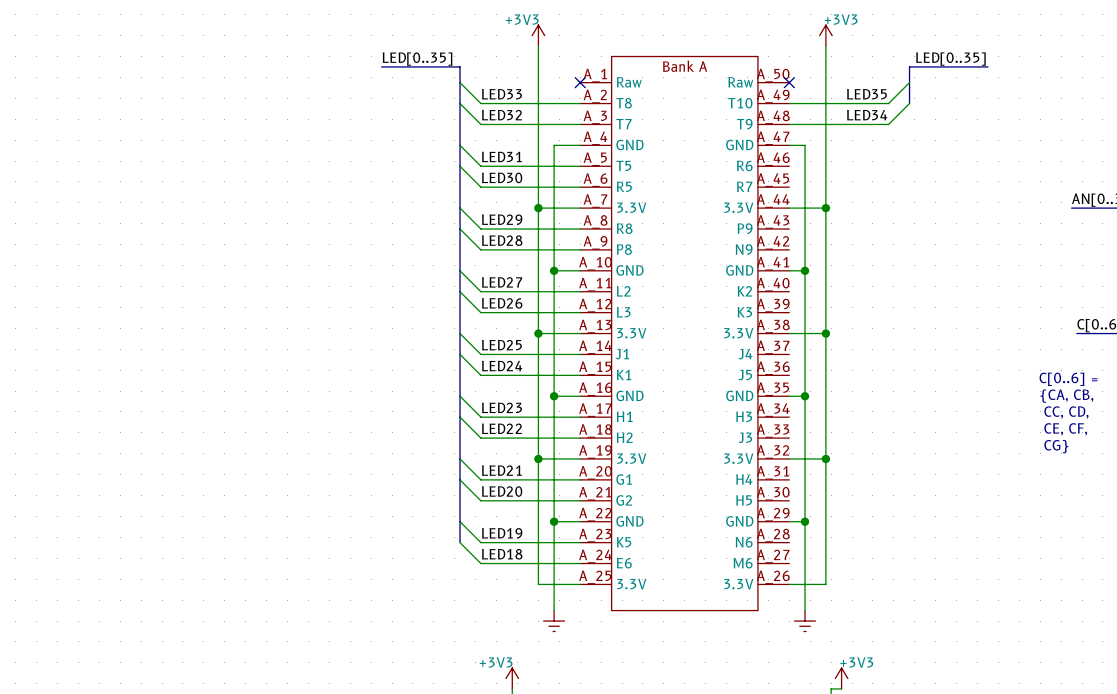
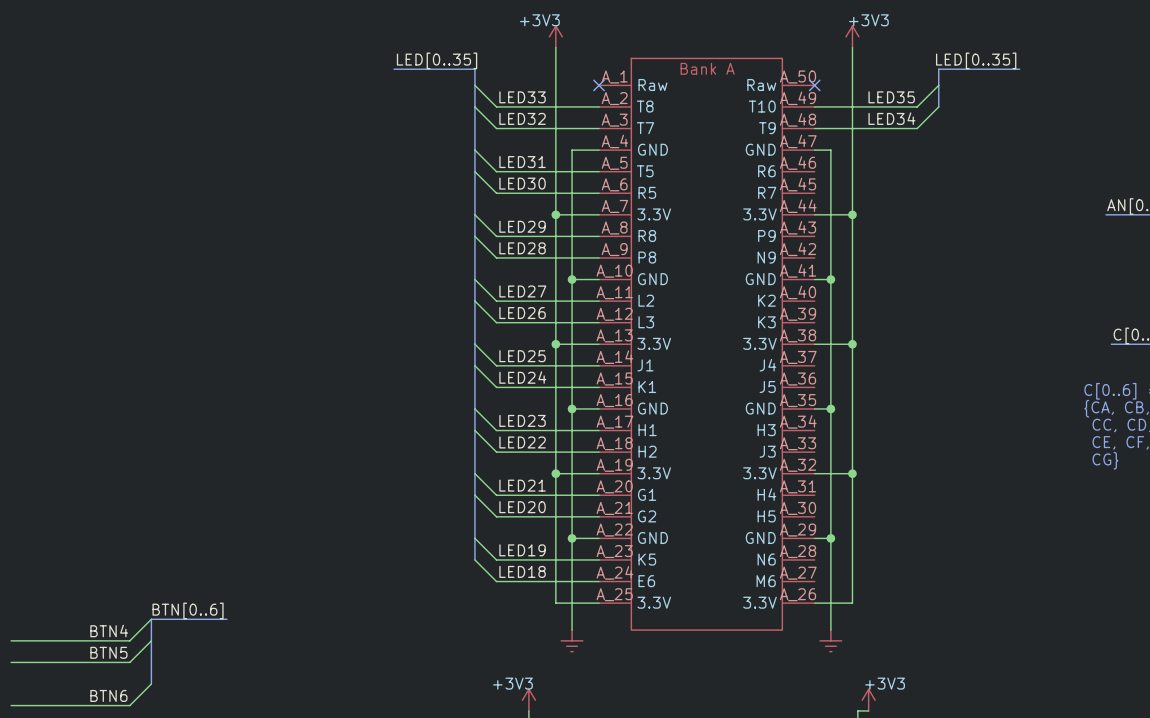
label: none -> BTN[0..6] (188, 610)
wire: none -> (151, 619) (129, 640) (11, 640)
bus: none -> (226, 619) (151, 619) (151, 684)
label: none -> BTN4 (109, 630)
wire: none -> (151, 640) (129, 662) (11, 662)
label: none -> BTN5 (108, 652)
wire: none -> (151, 684) (129, 705) (11, 705)
label: none -> BTN6 (108, 695)

